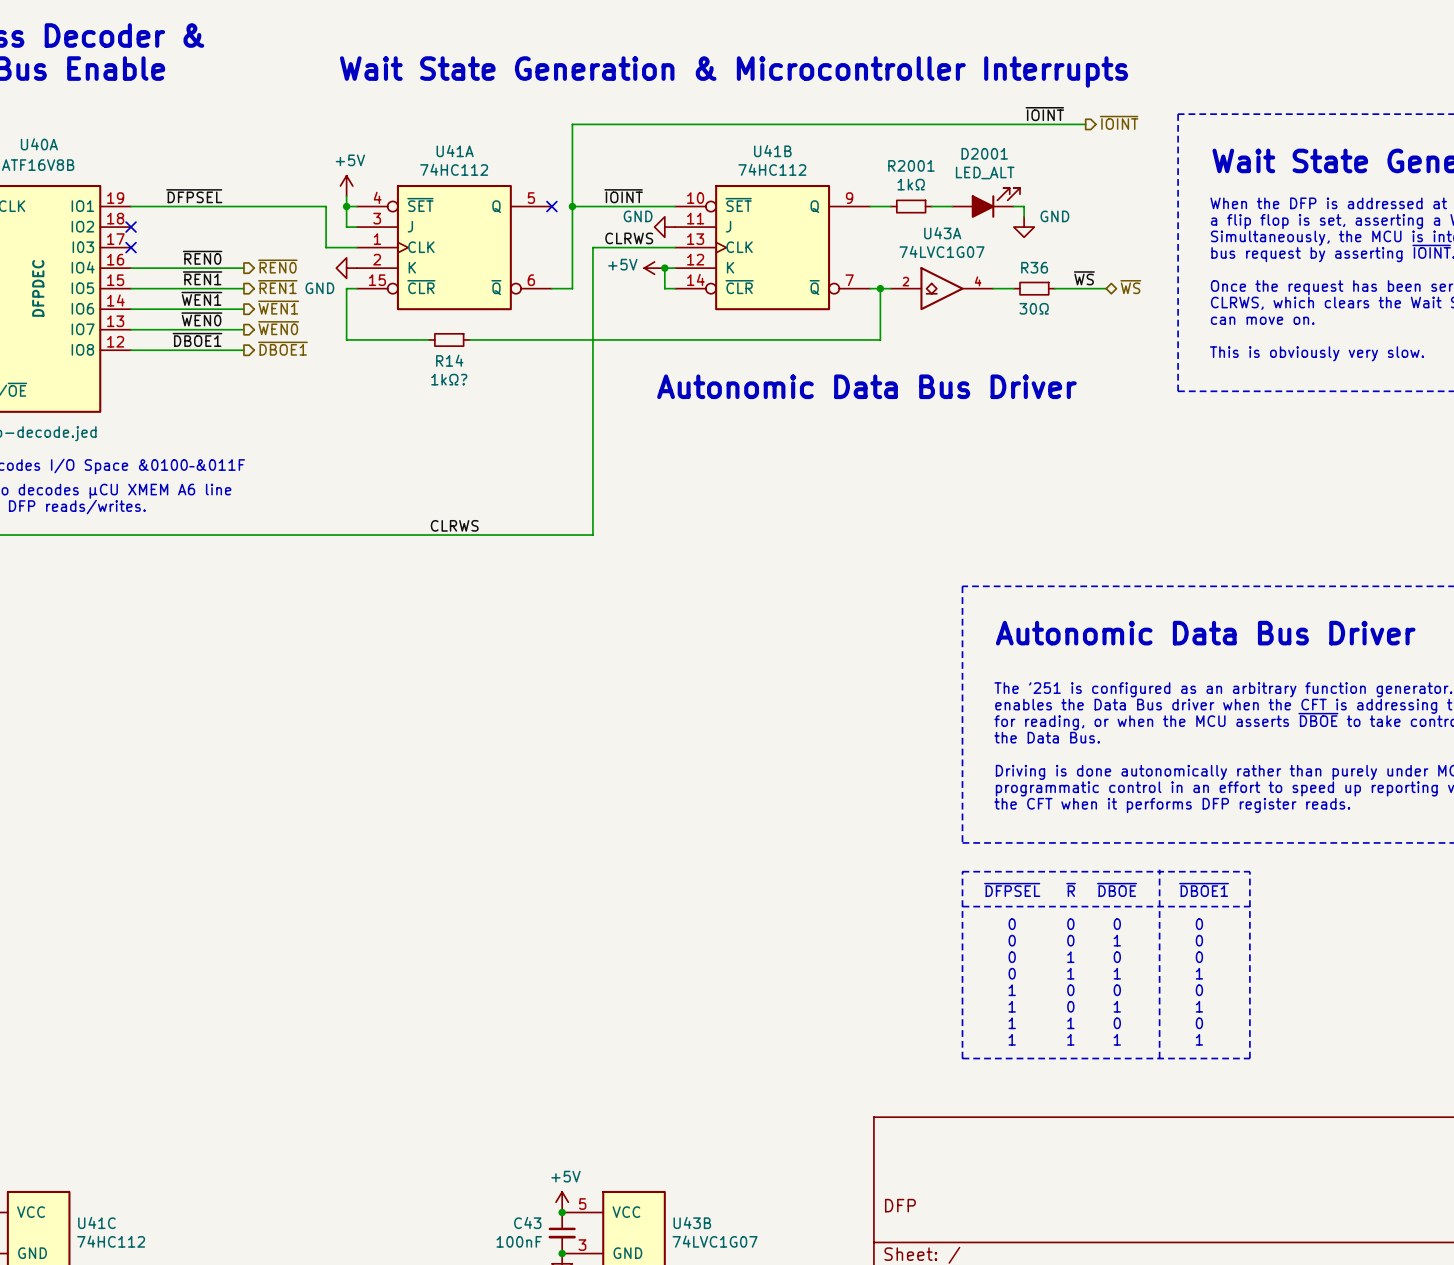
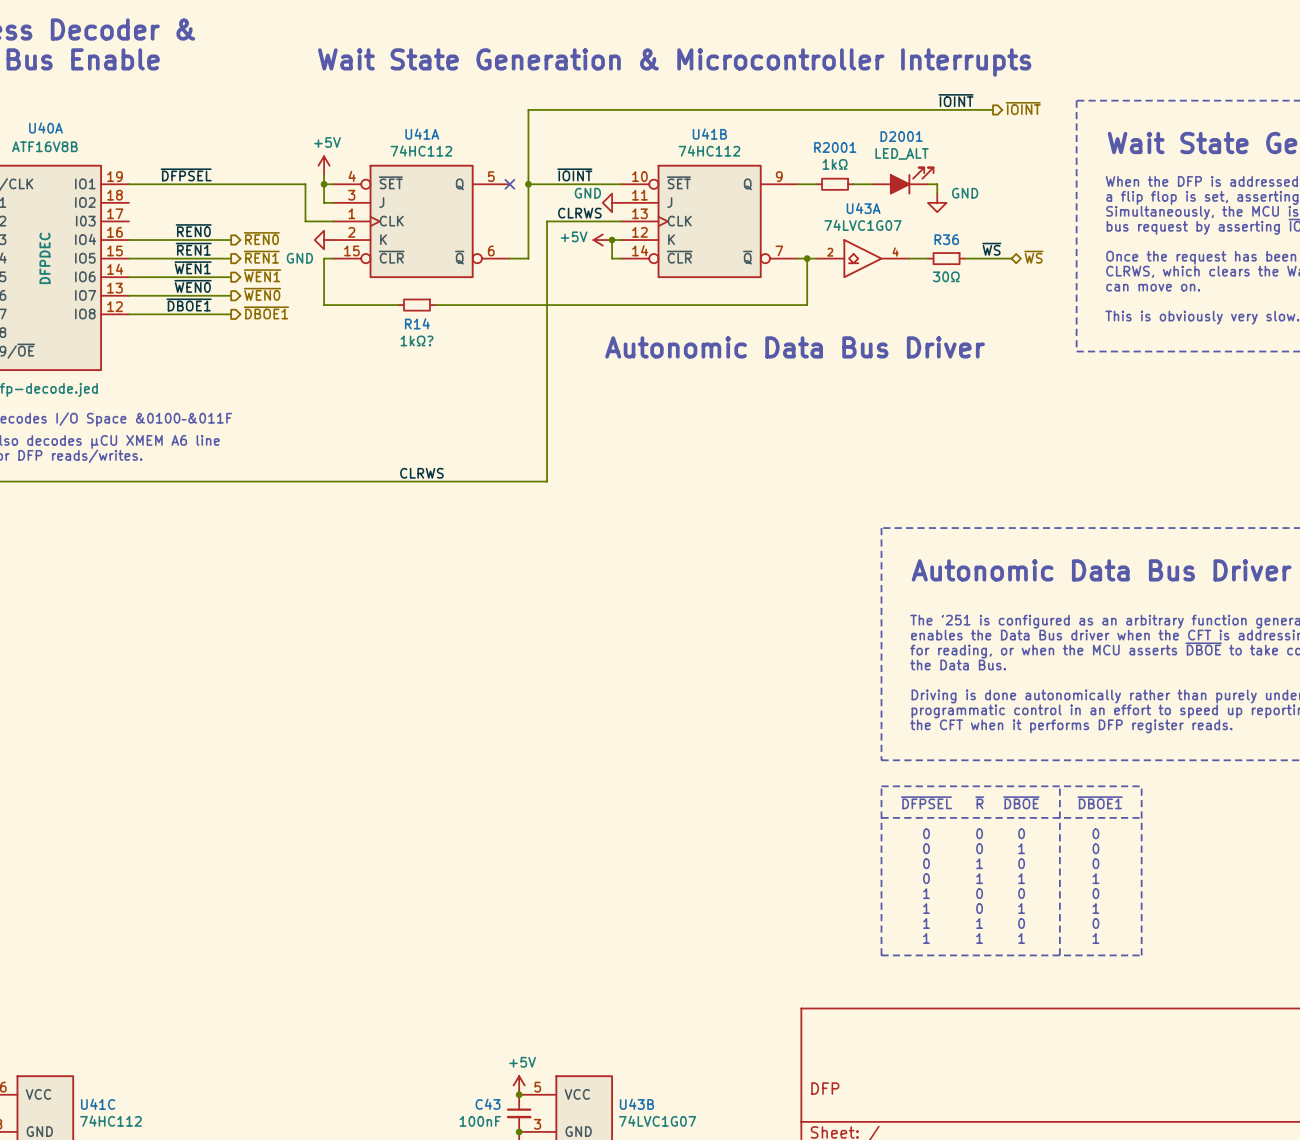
no-connect mark: (131, 227) -> none
no-connect mark: (131, 247) -> none

